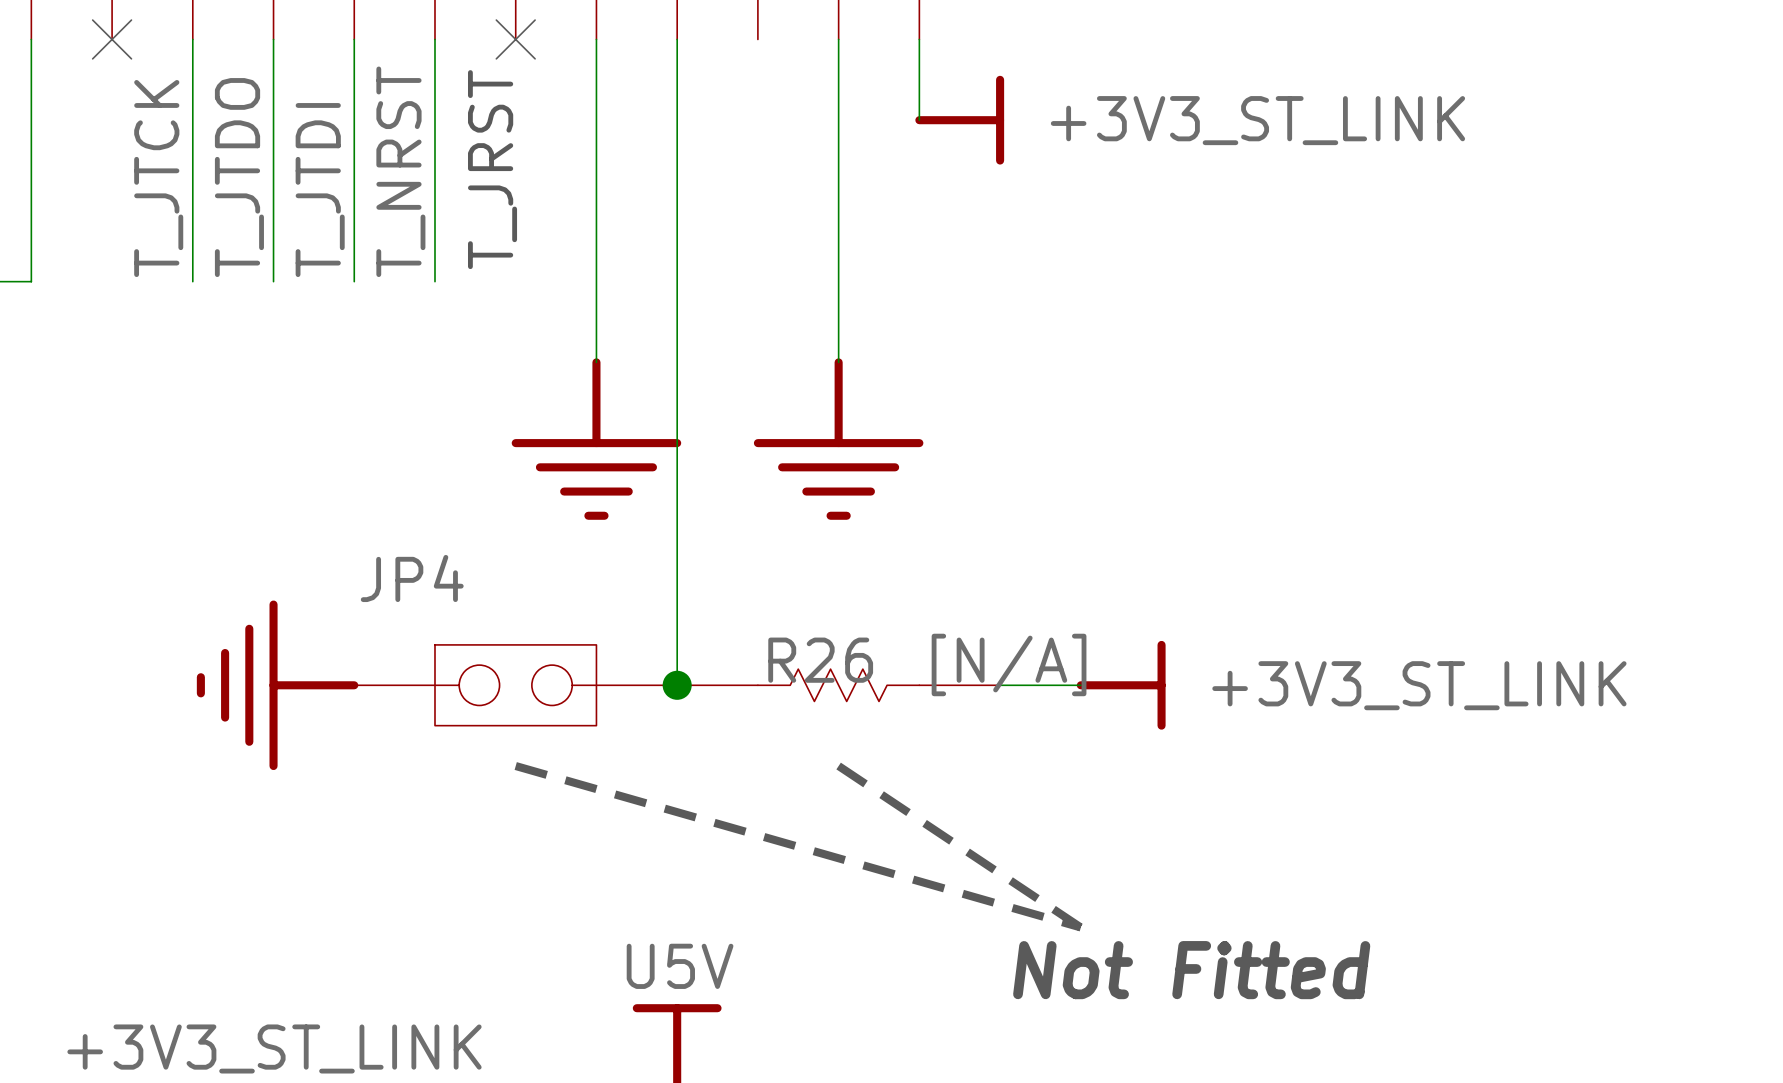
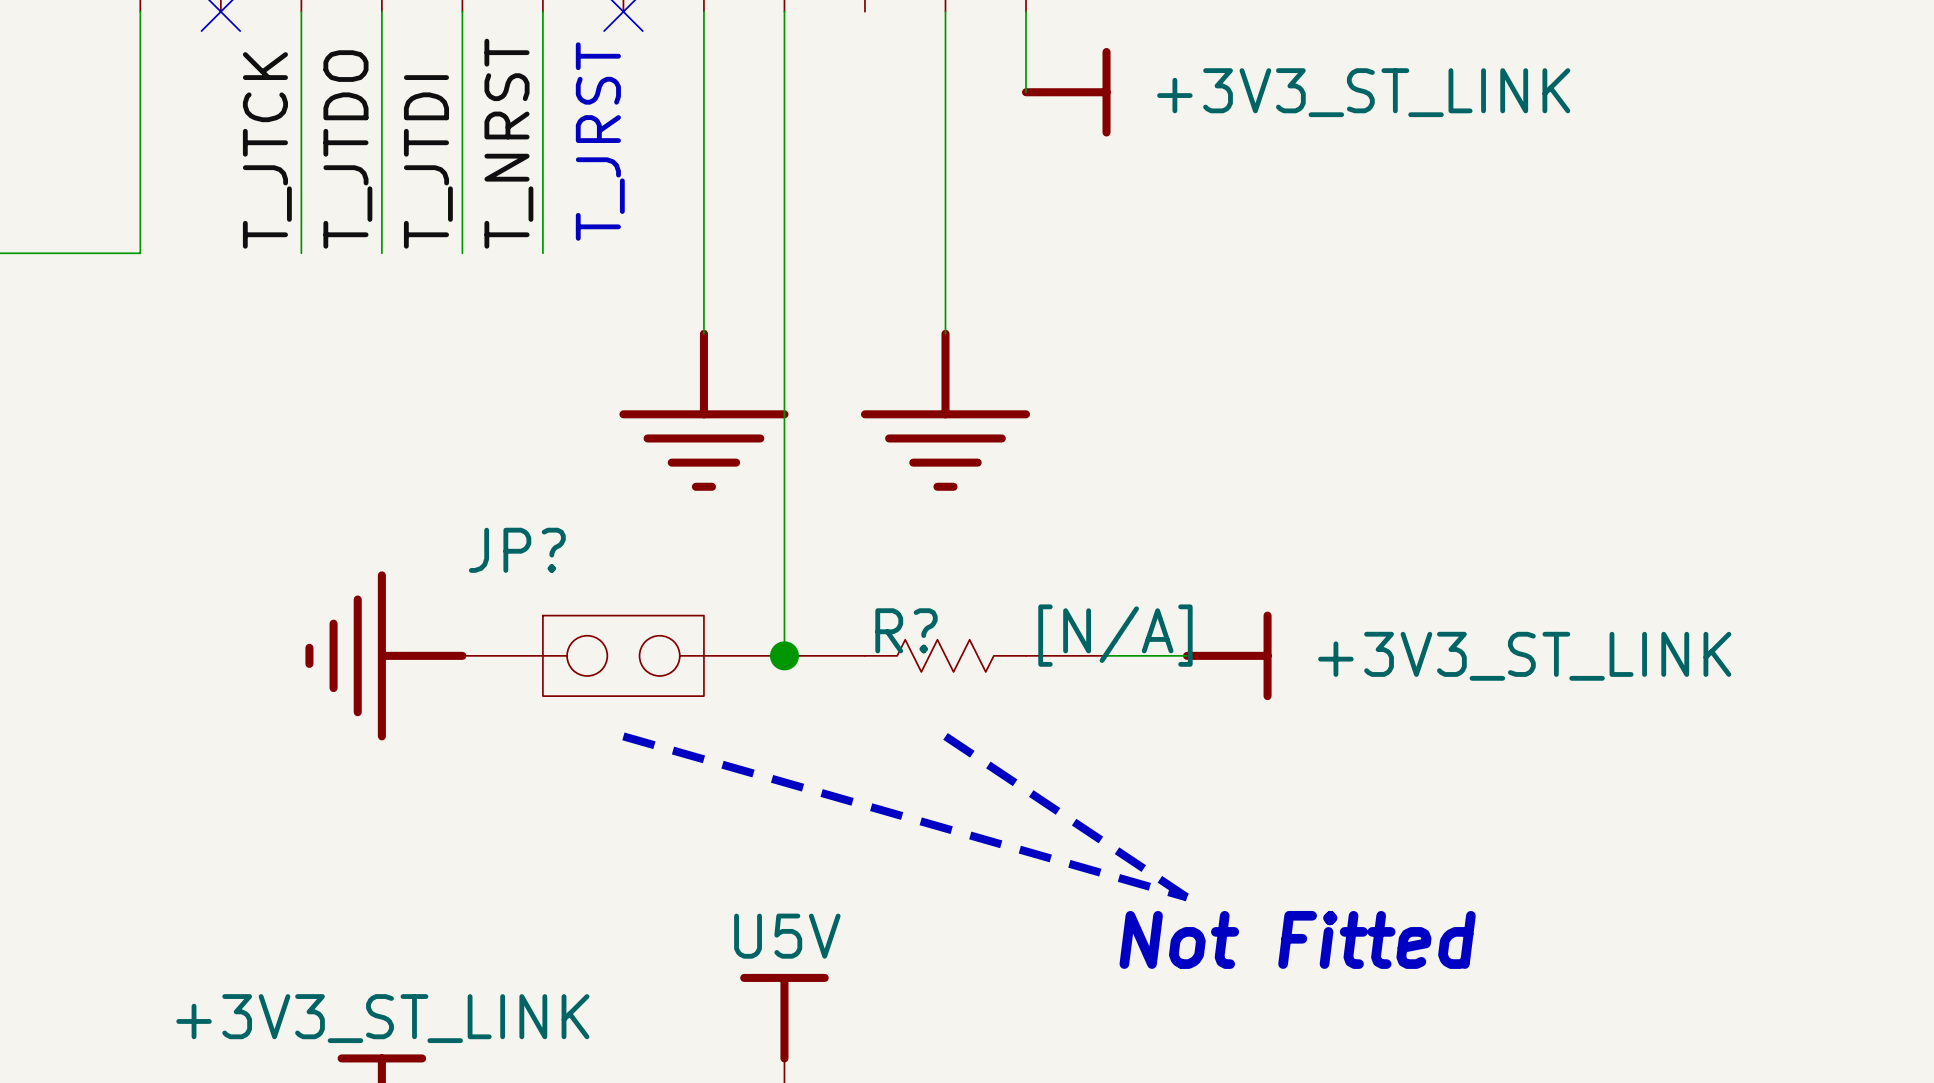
JP4 name: JP4 (412, 578) -> JP? (517, 550)
R26 name: R26 (820, 660) -> R? (906, 630)

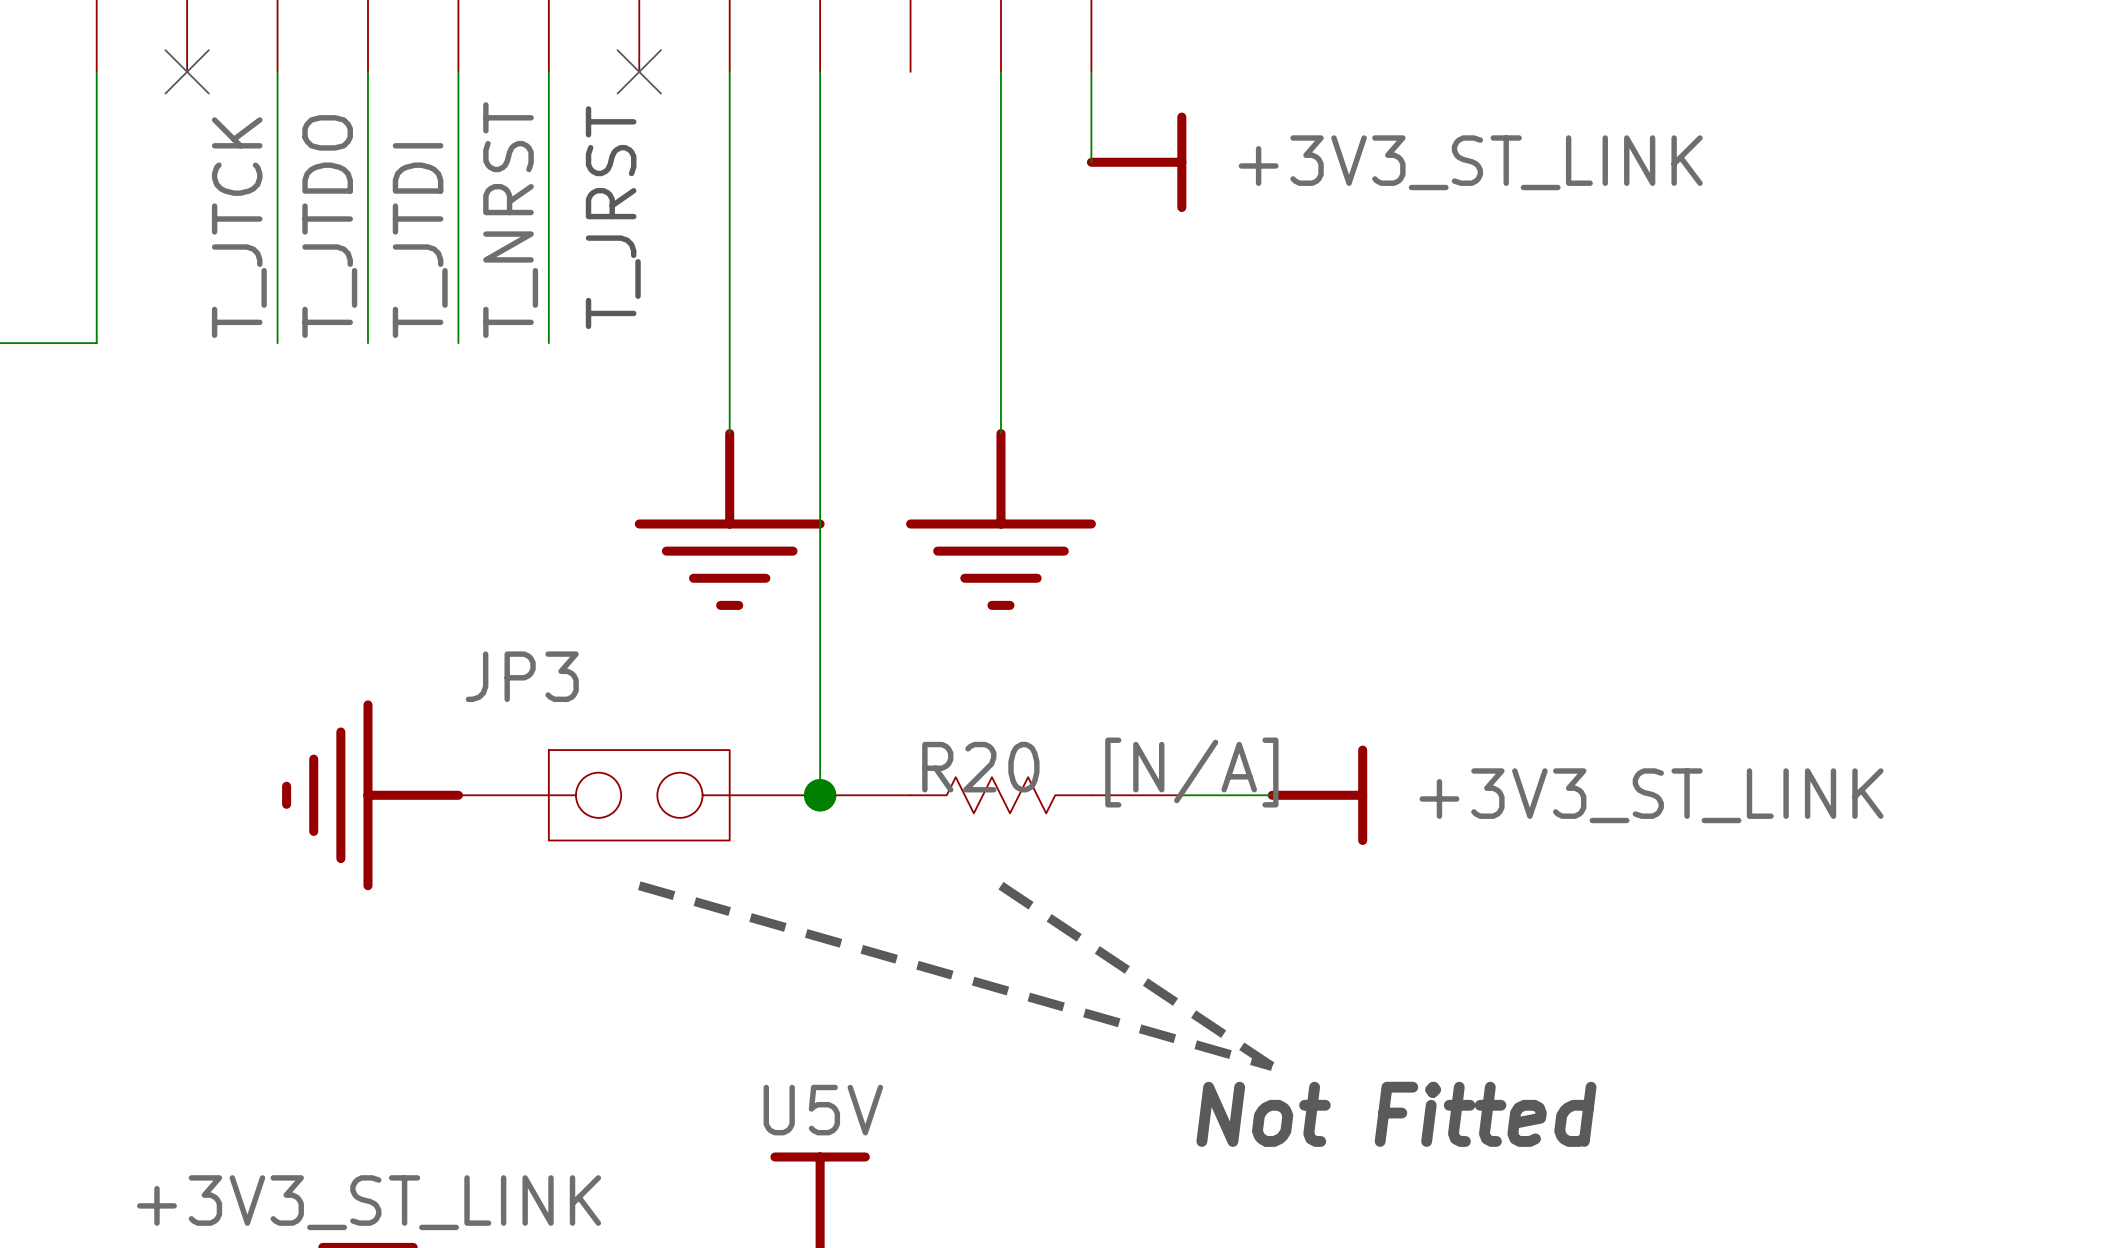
JP? name: JP? (517, 550) -> JP3 (522, 676)
R? name: R? (906, 630) -> R20 (980, 767)

